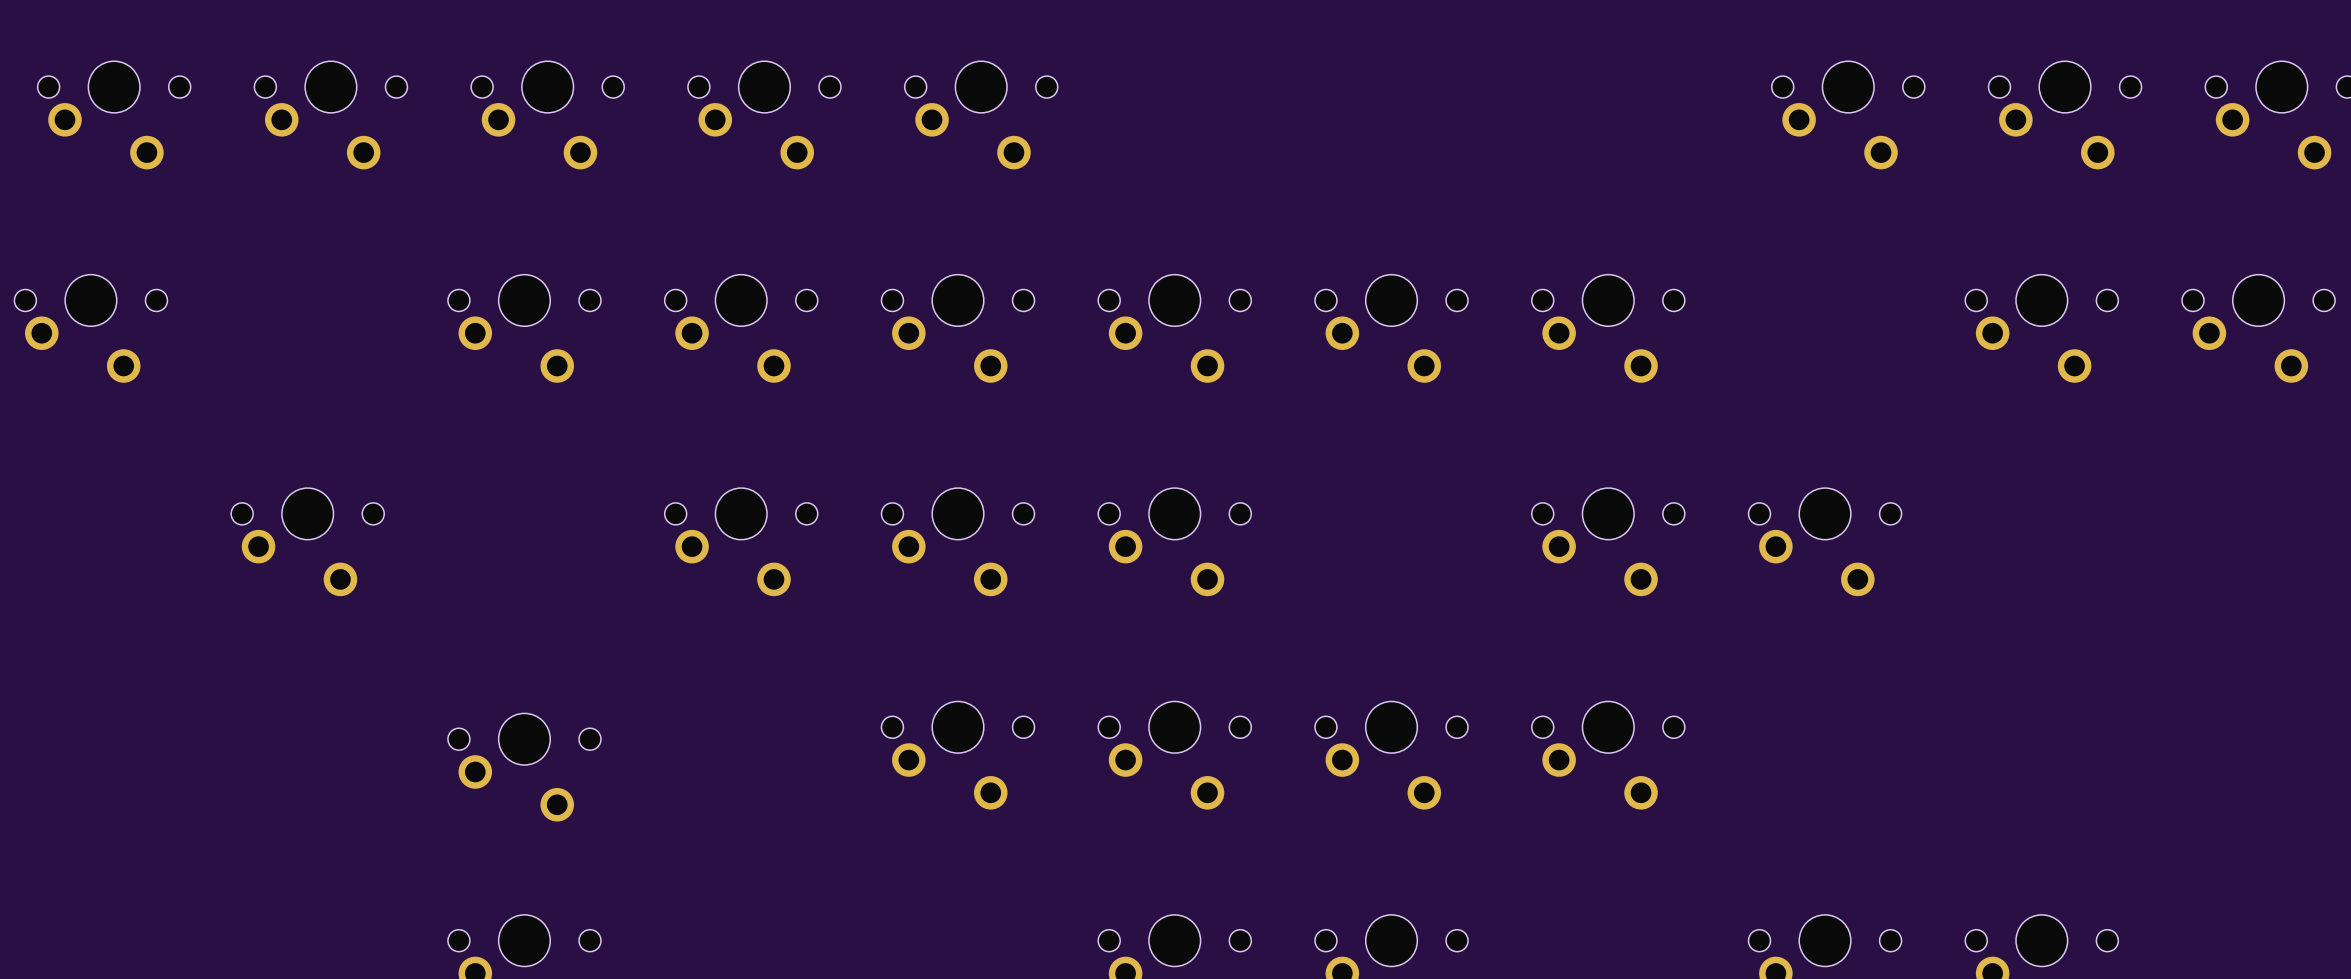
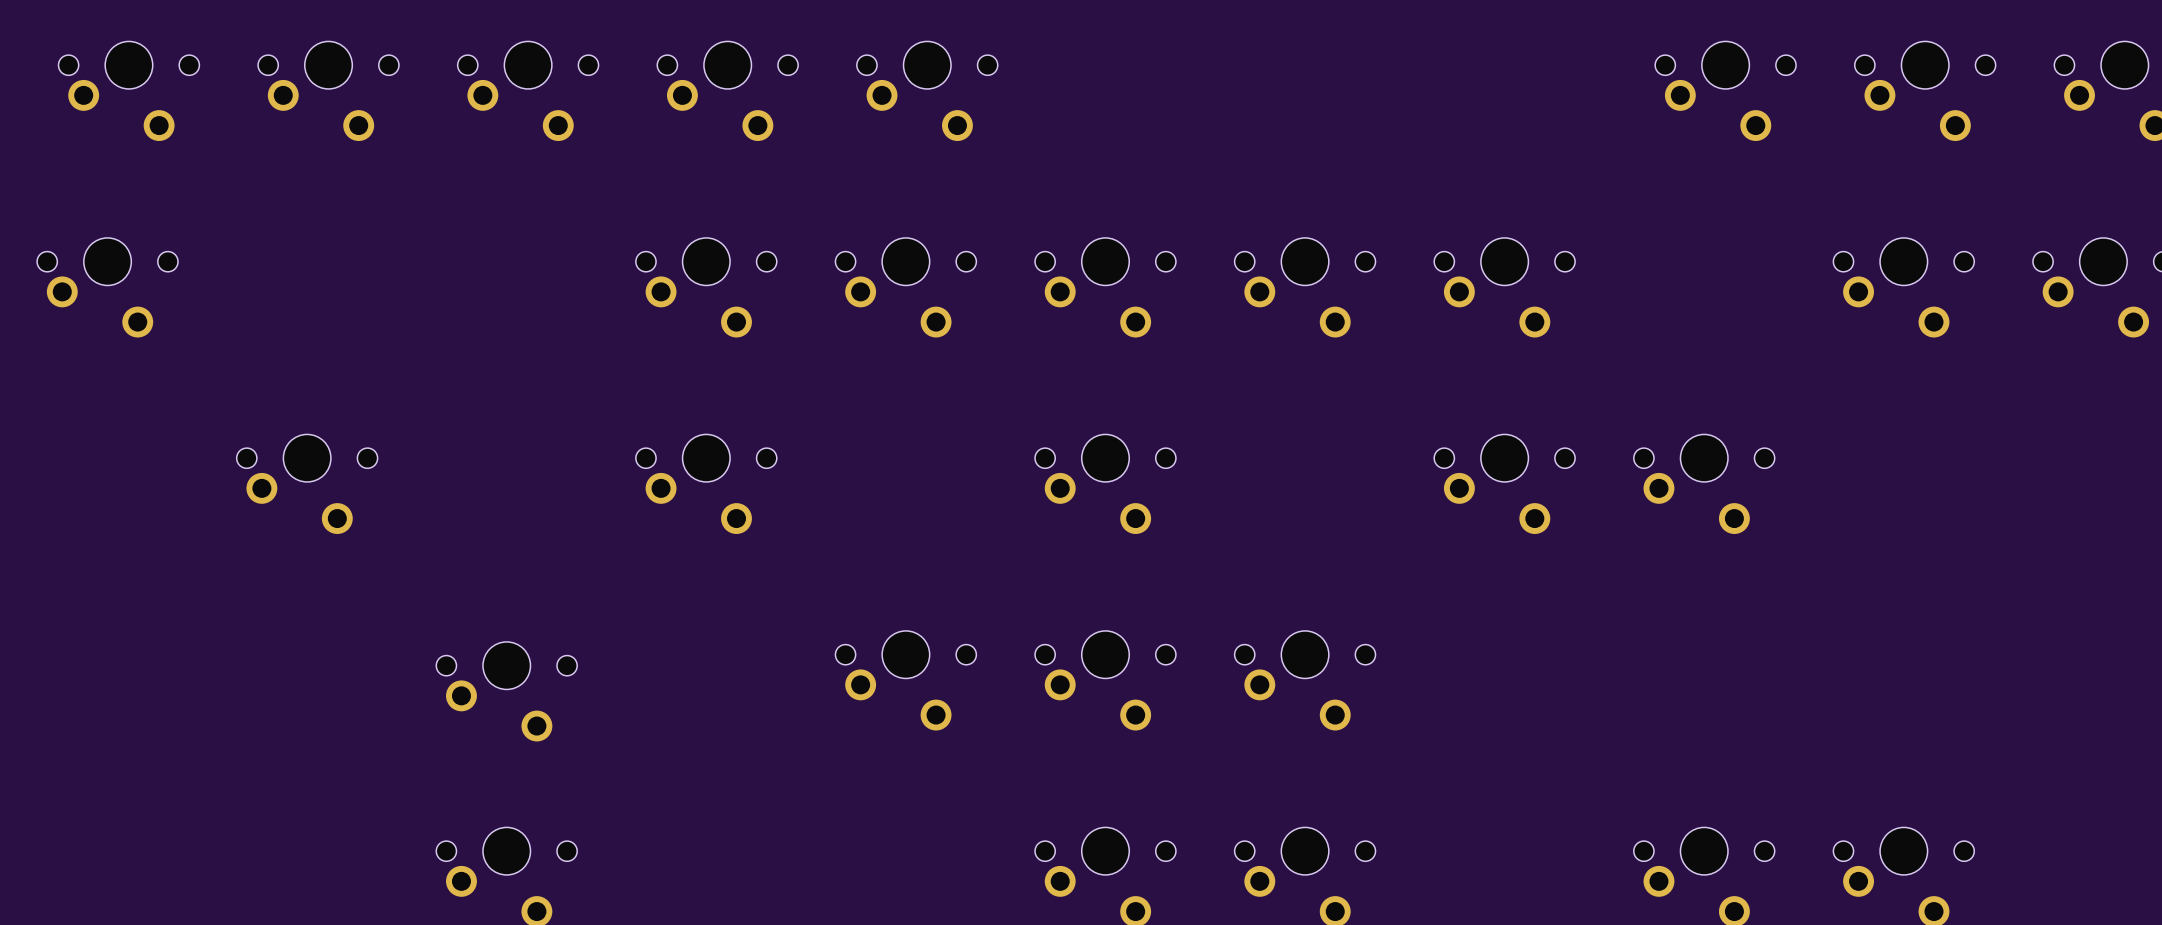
part: (524, 328) -> none
part: (957, 542) -> none
part: (1608, 755) -> none

